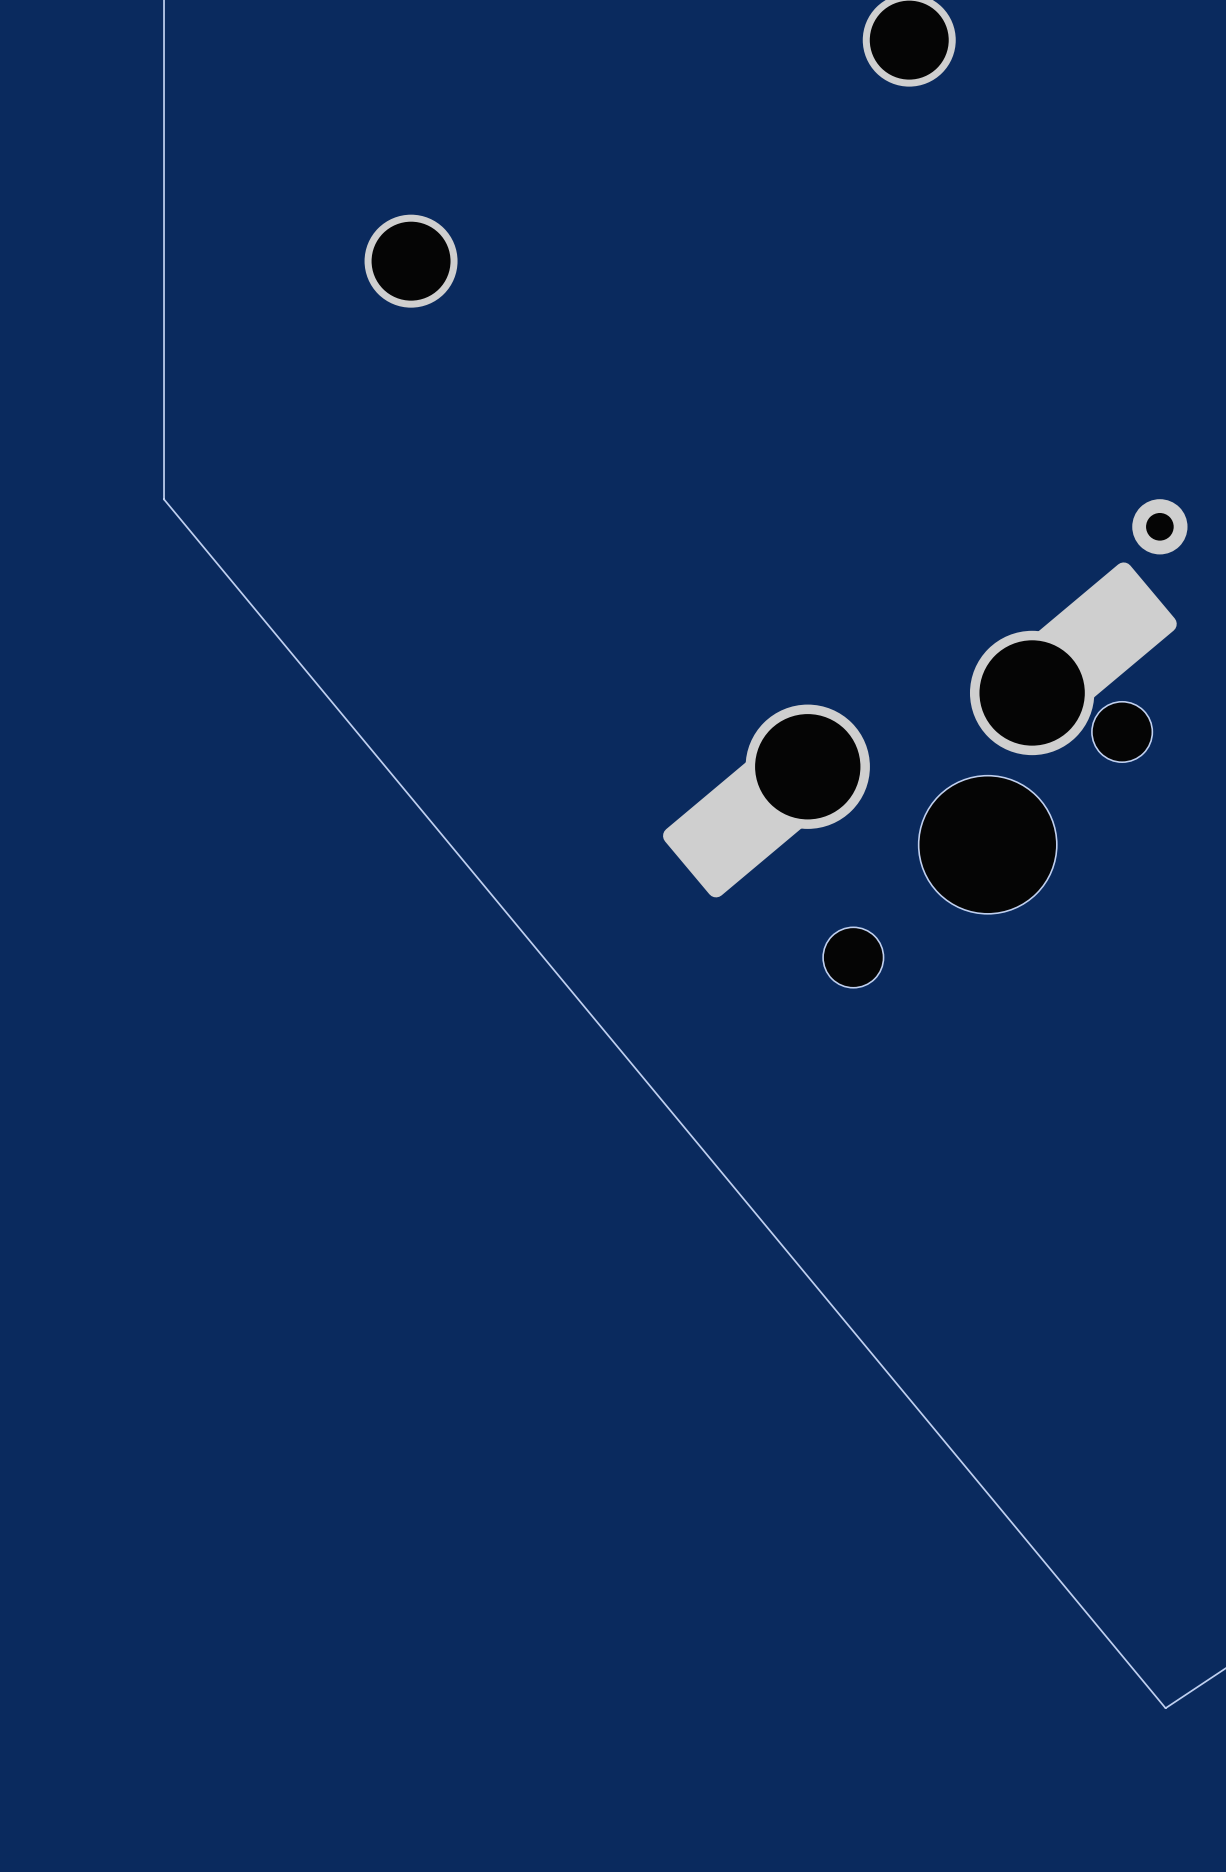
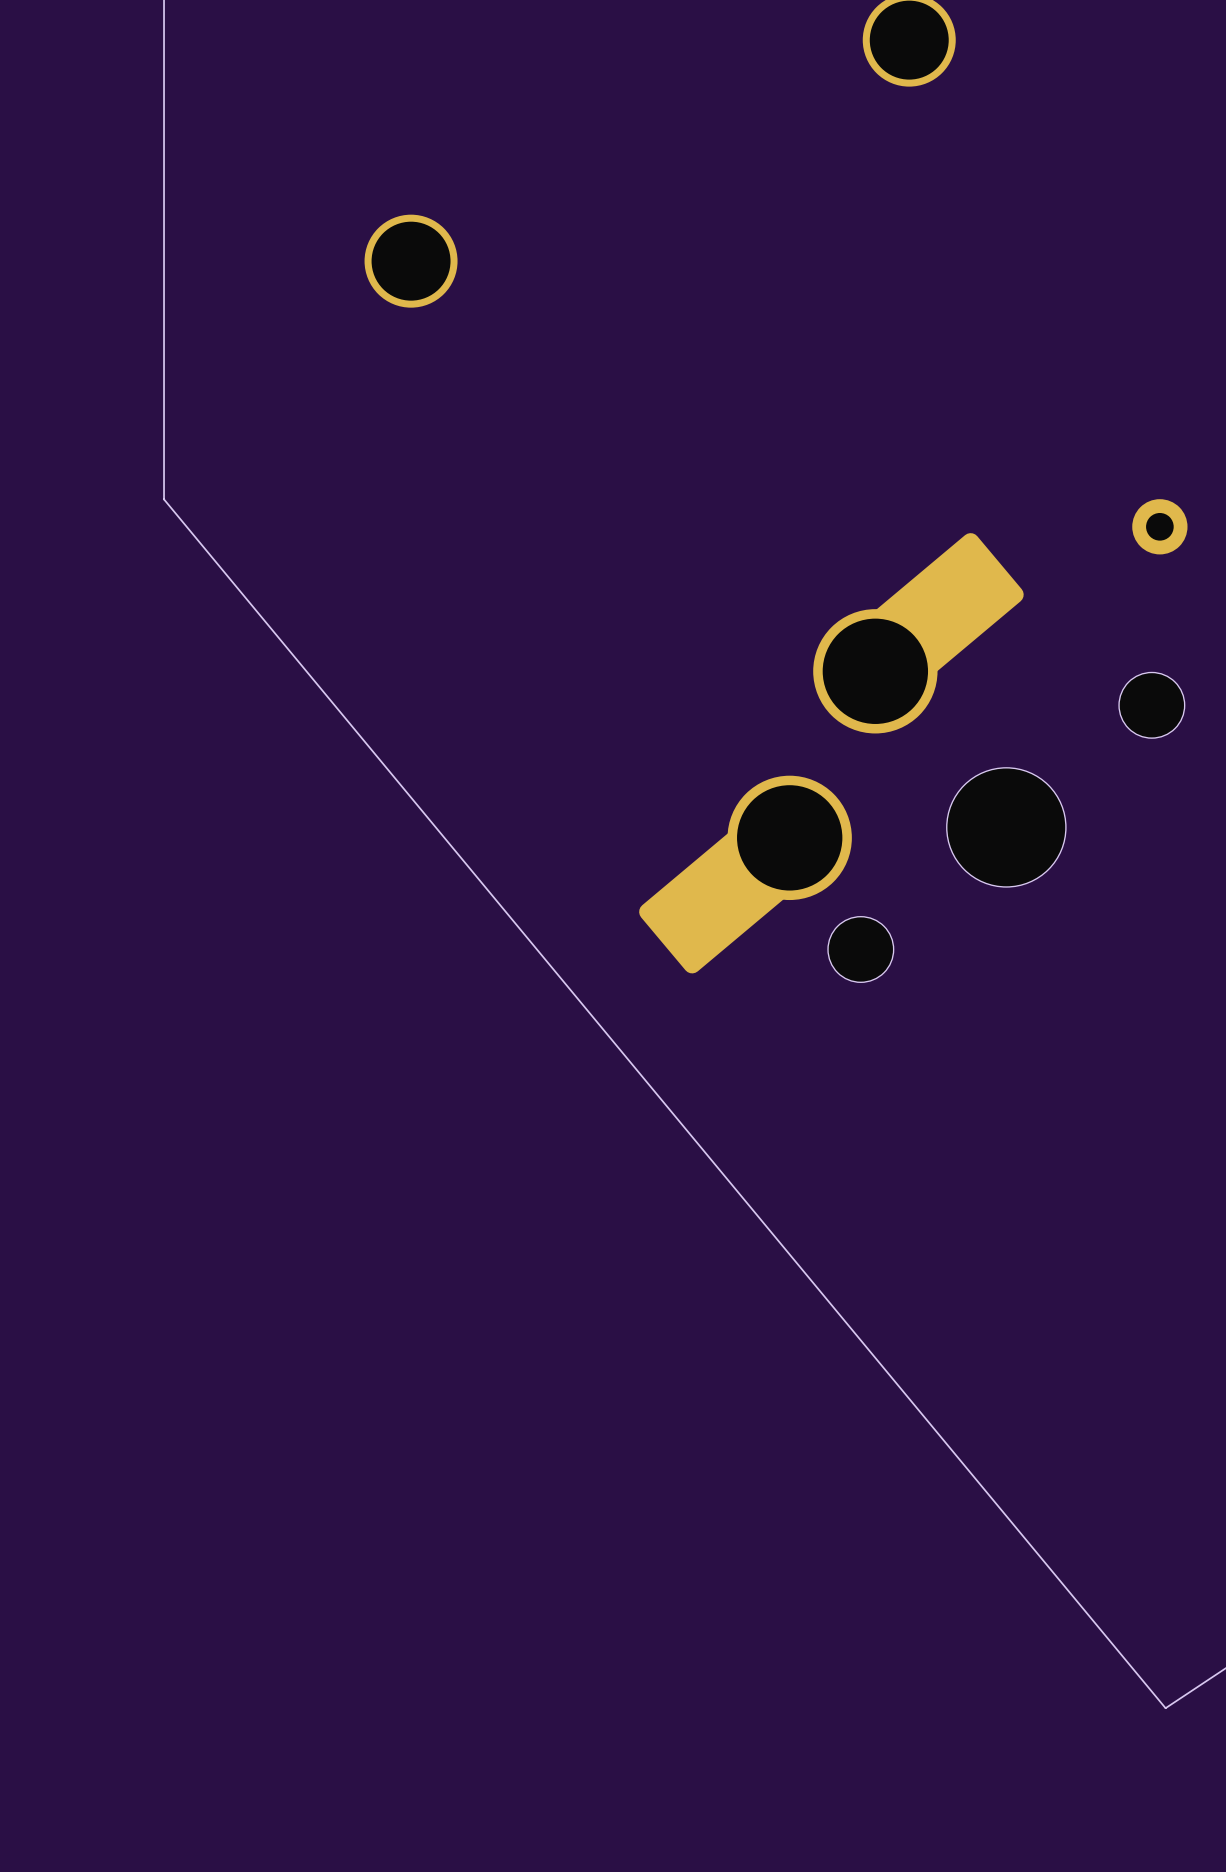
part footprint: [663, 562, 1177, 988] -> [639, 533, 1185, 983]

